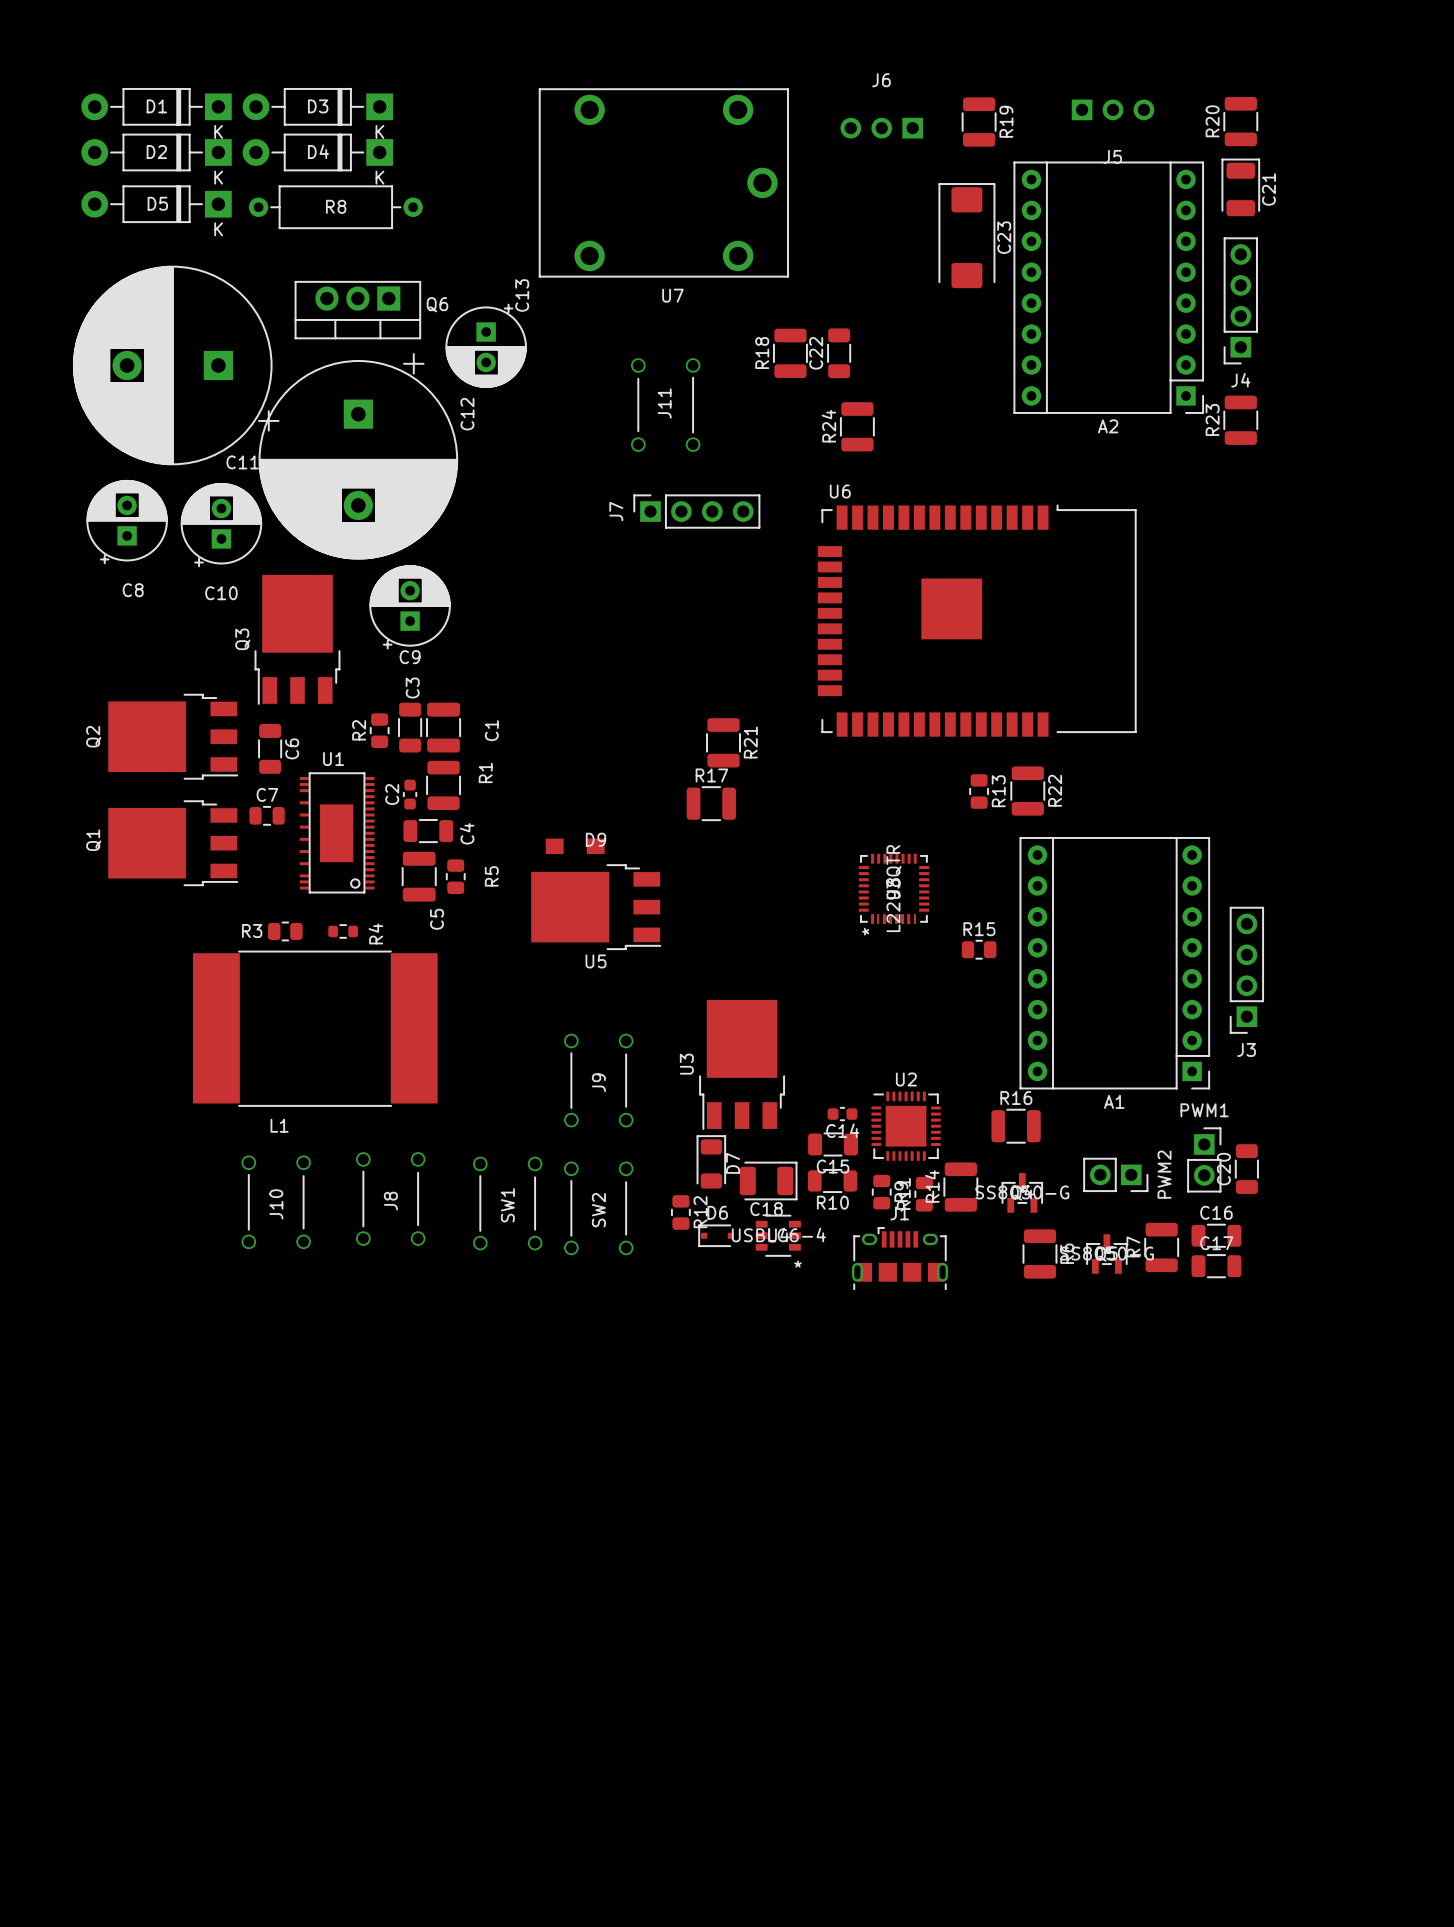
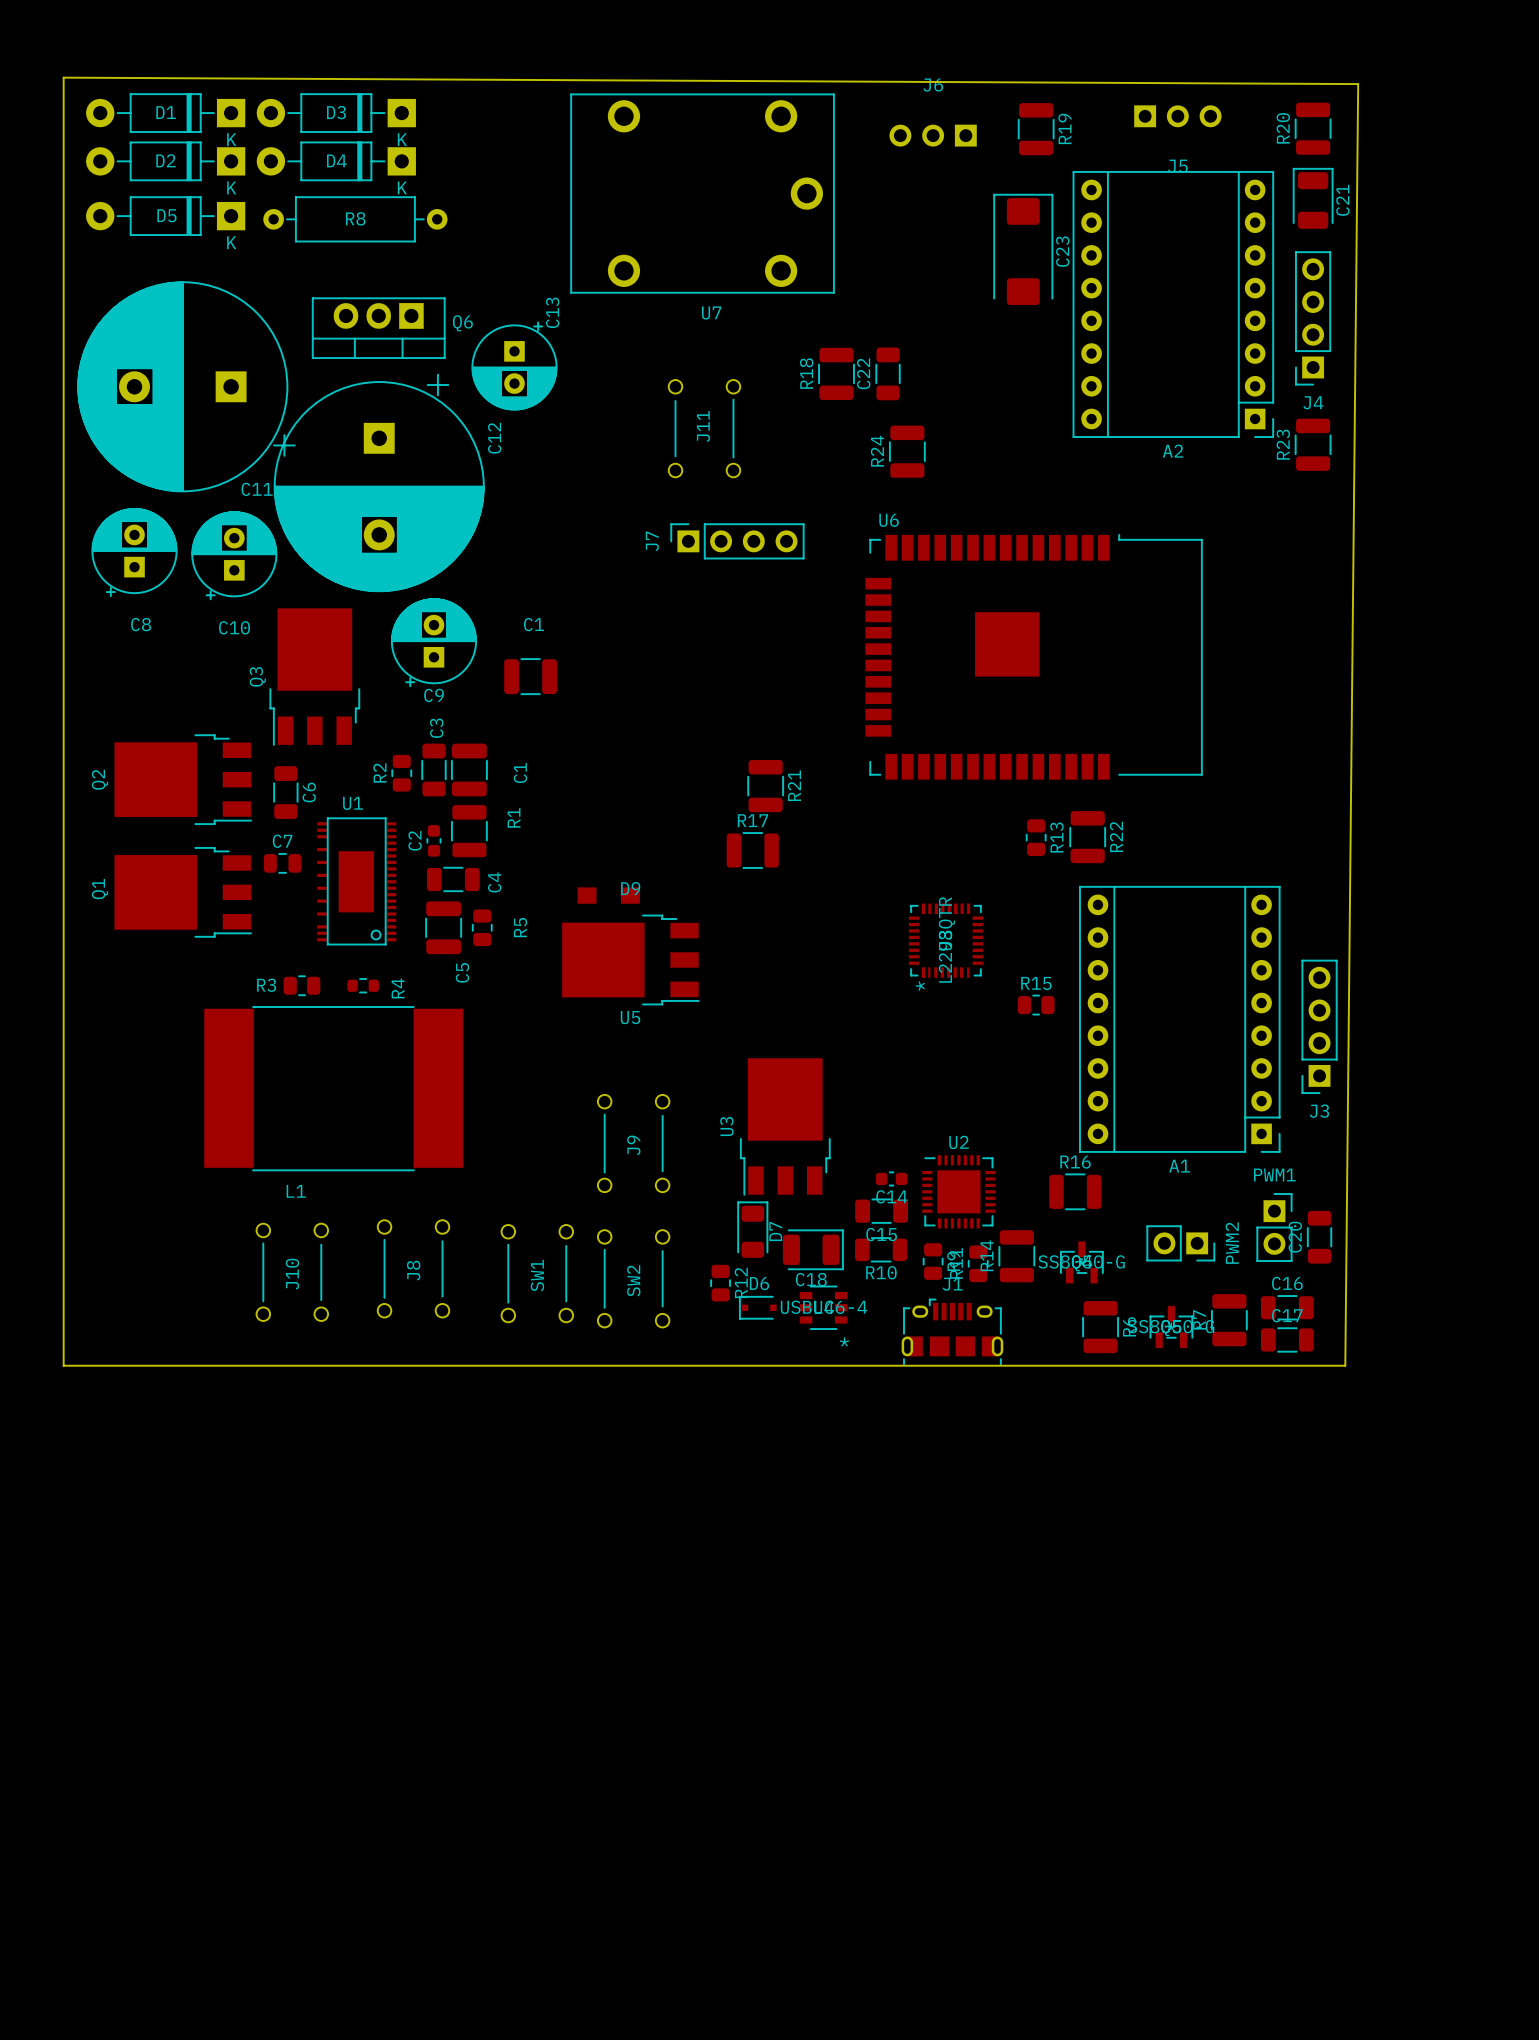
board edge: none -> (63, 77) (63, 1365) (1345, 1365) (1358, 84) (63, 77)
C1: none -> (530, 676)

